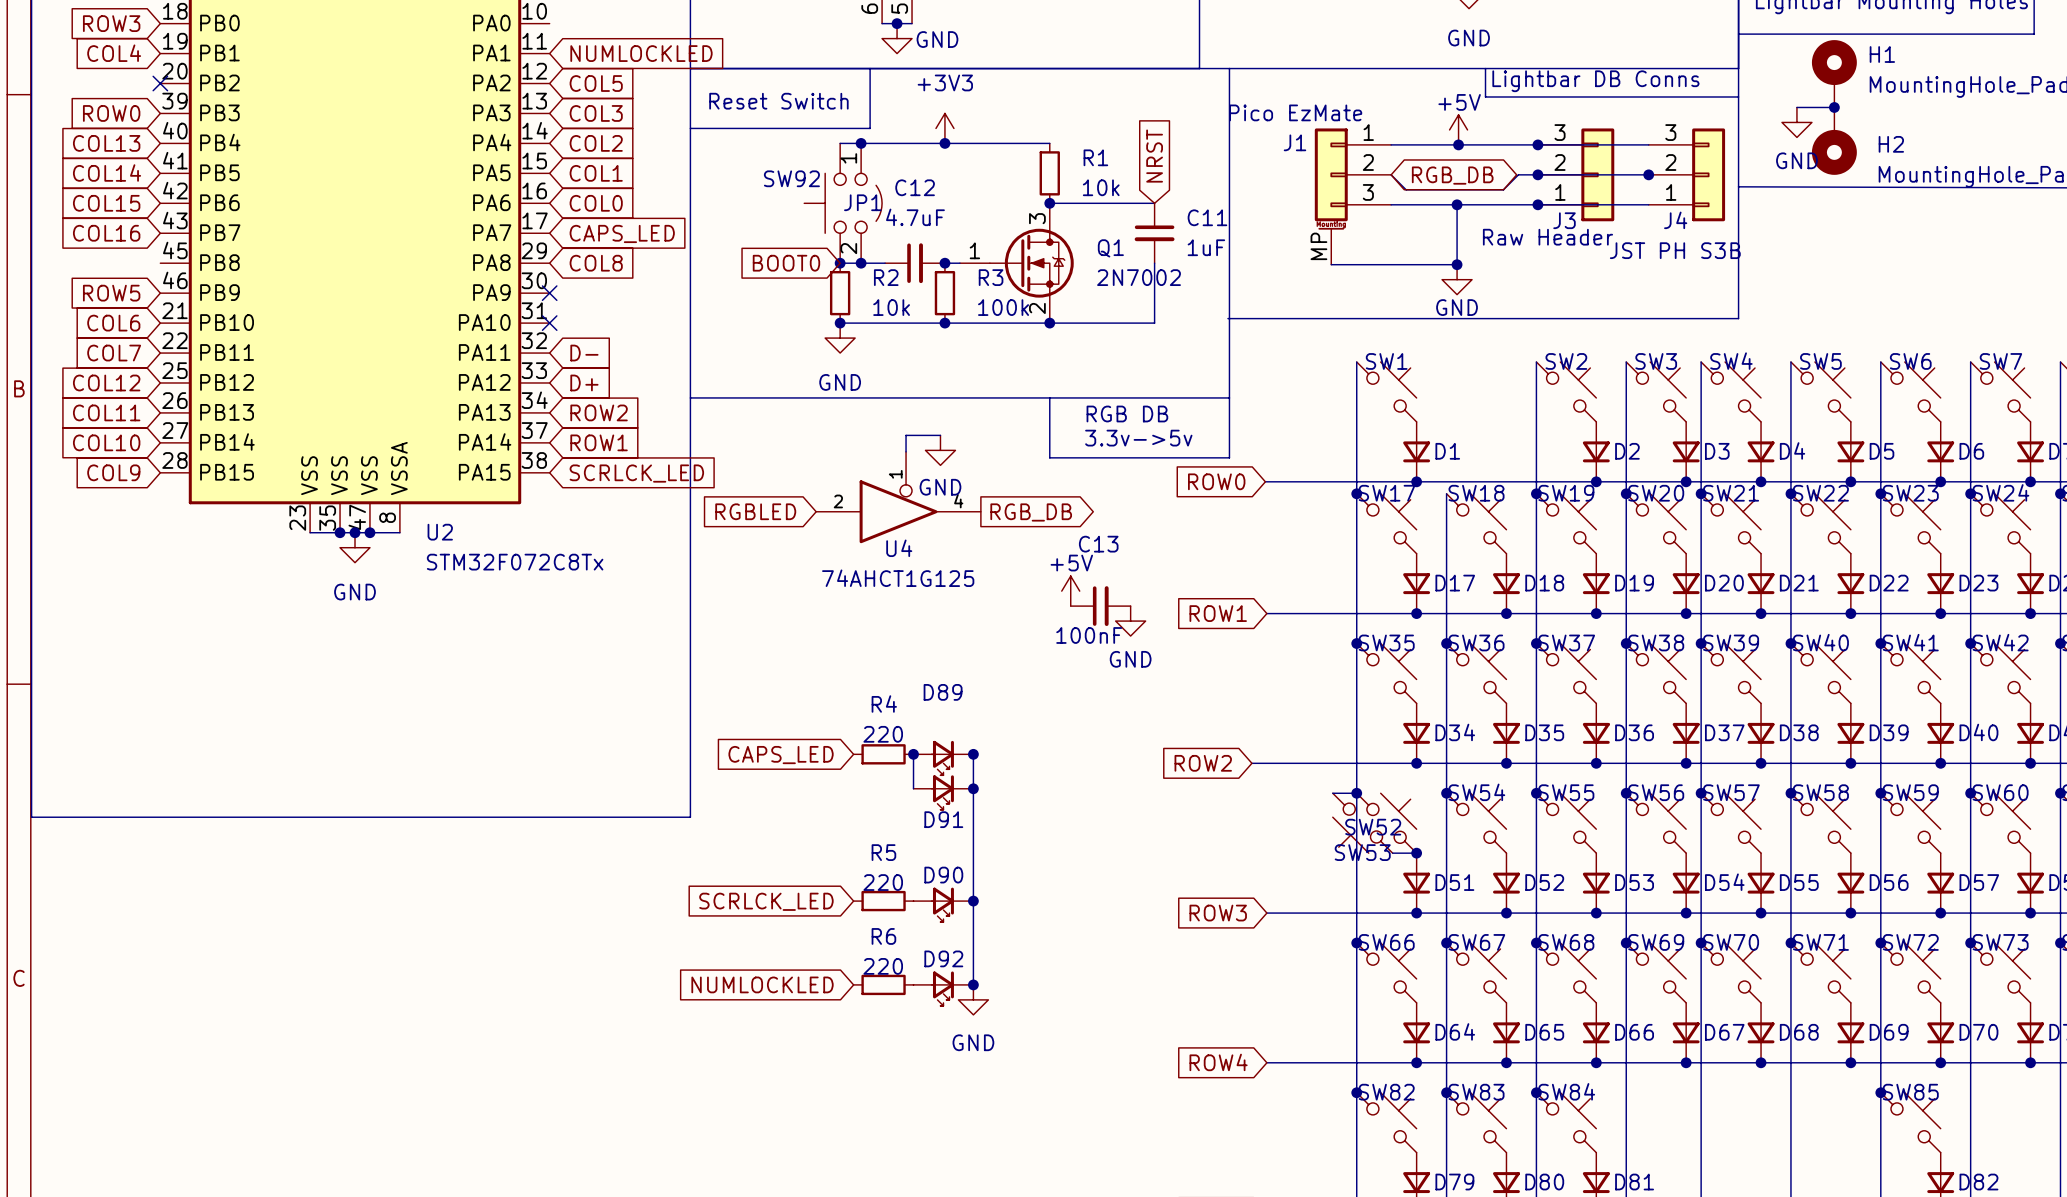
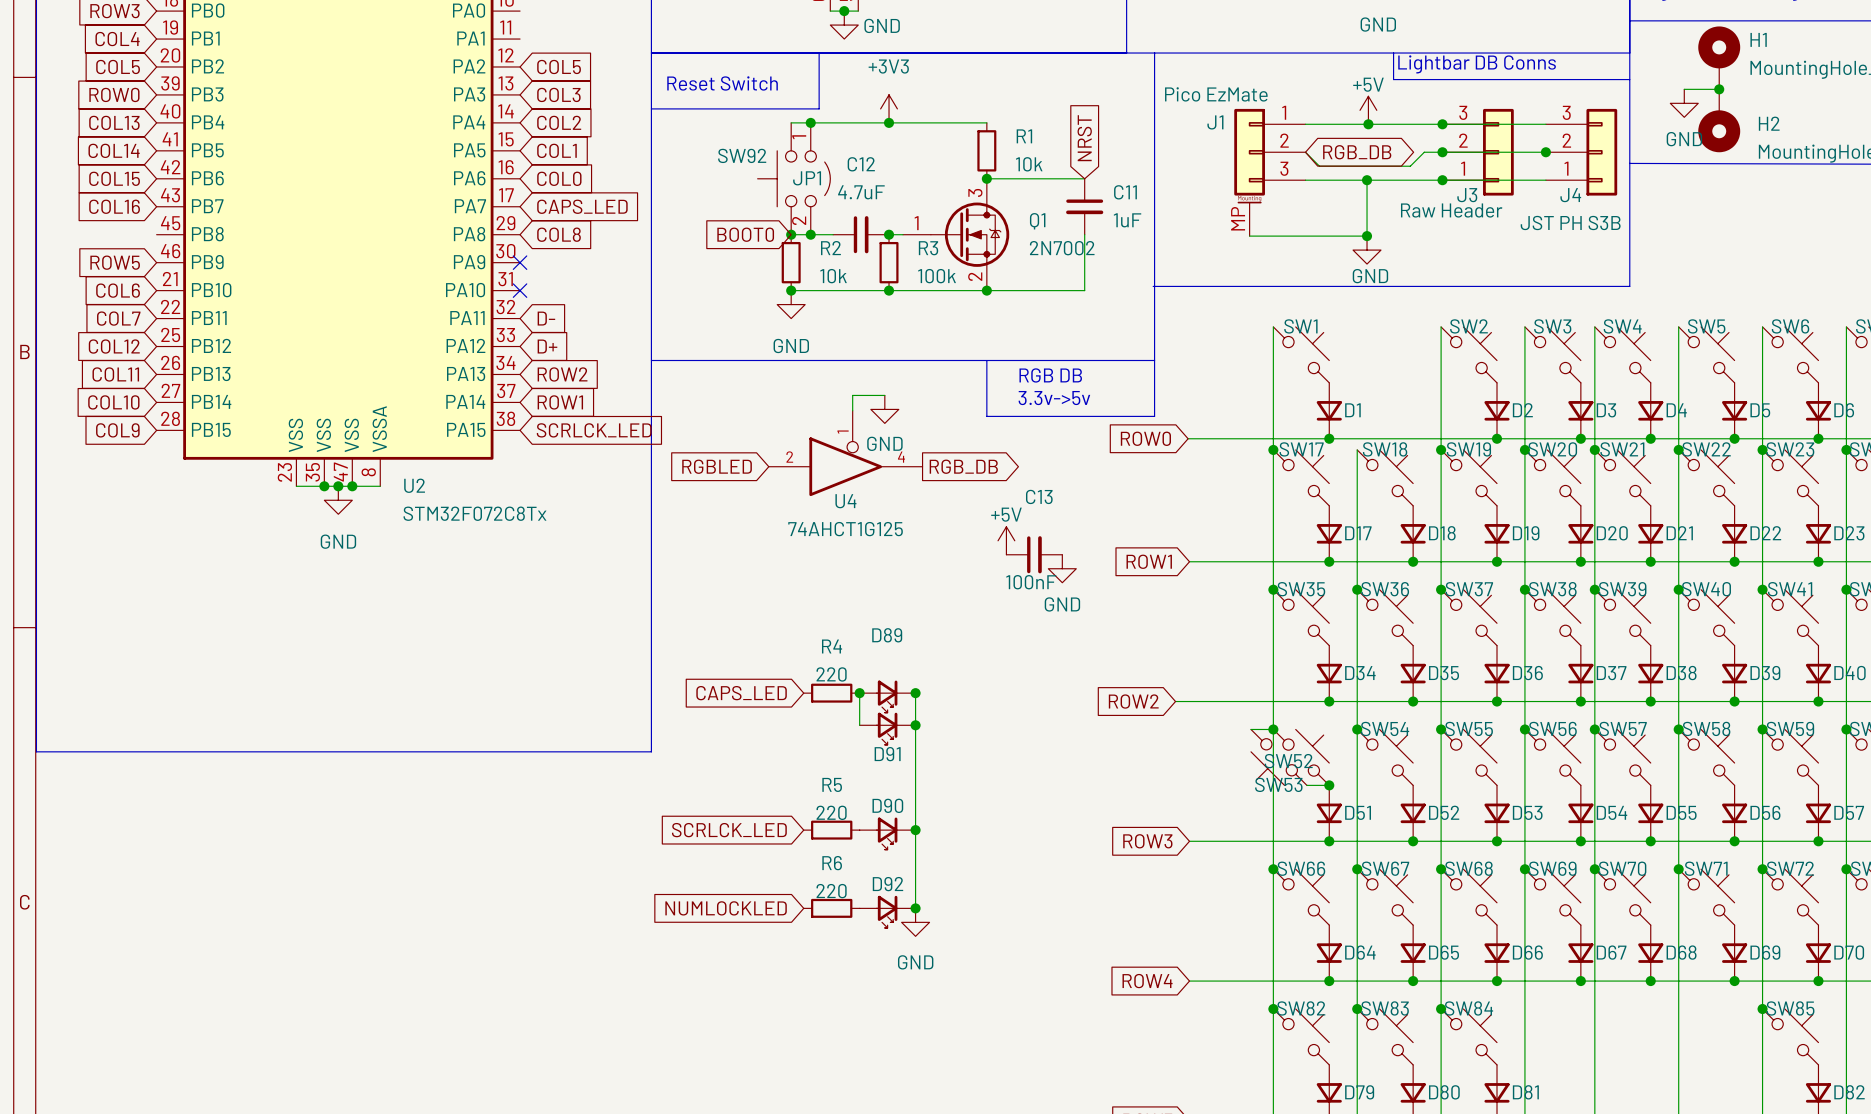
global label: NUMLOCKLED (641, 53) -> none
global label: none -> COL5 (118, 67)
no-connect mark: (160, 83) -> none

